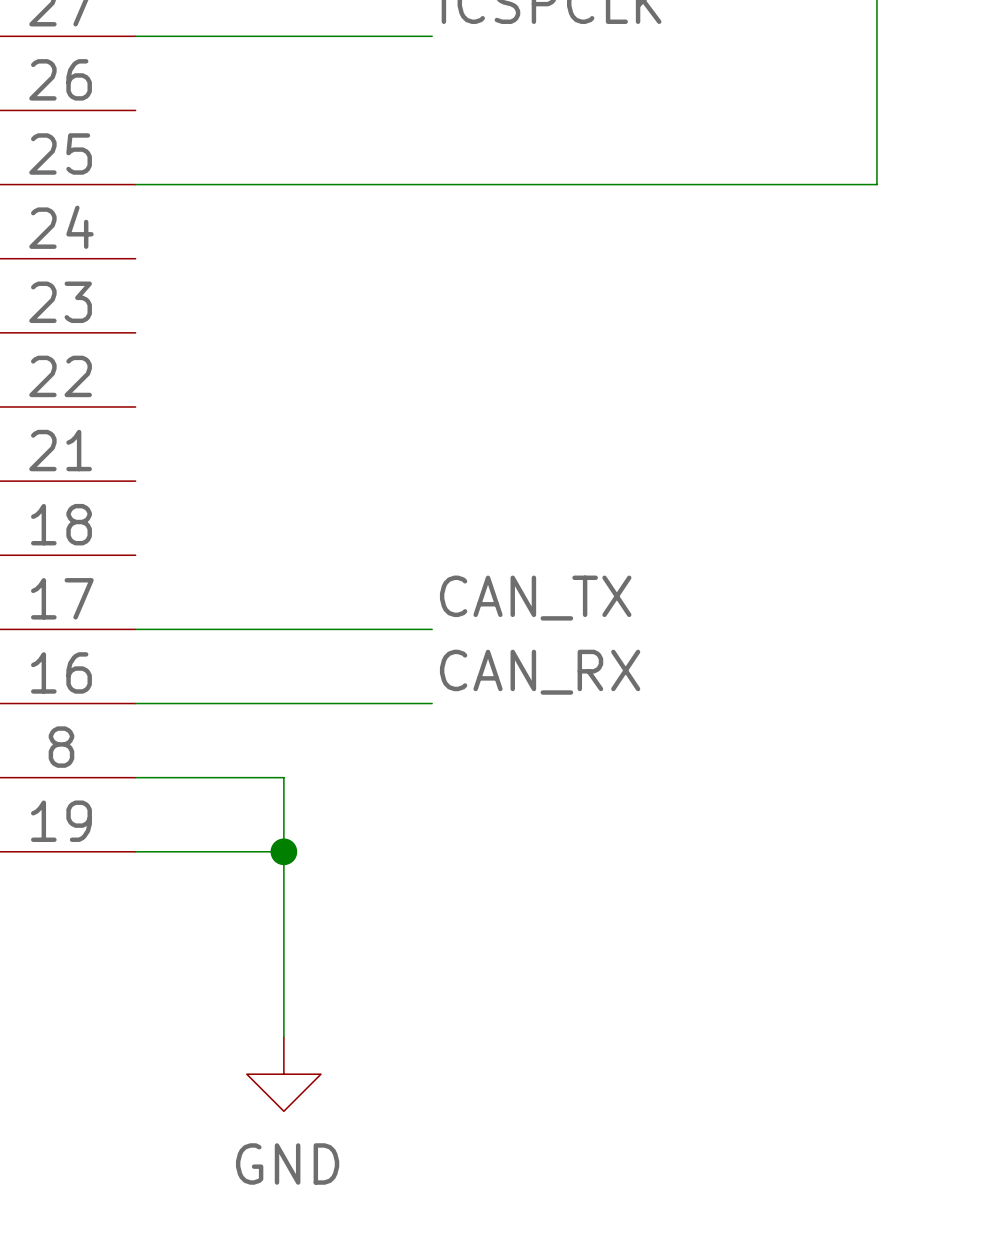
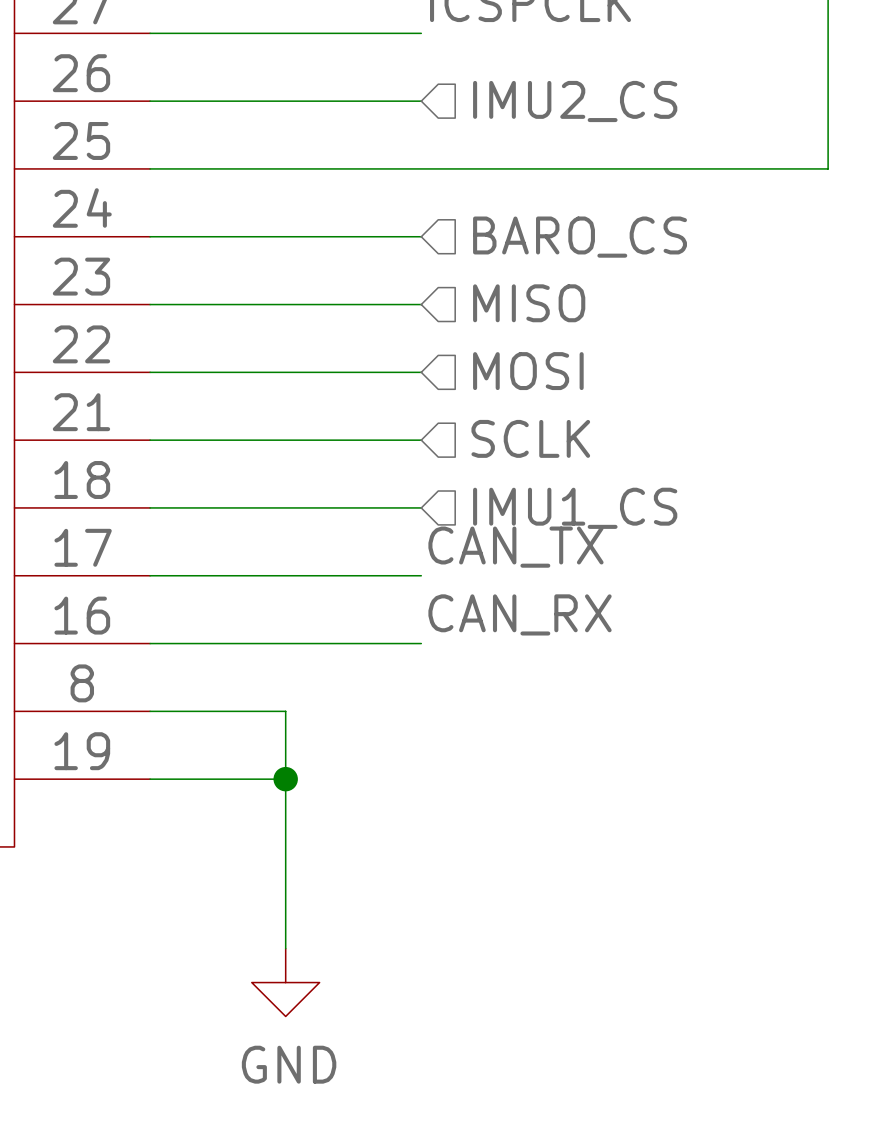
wire: none -> (150, 101) (421, 101)
hierarchical label: none -> IMU2_CS (575, 101)
wire: none -> (150, 236) (421, 236)
hierarchical label: none -> BARO_CS (580, 237)
hierarchical label: none -> MISO (529, 303)
wire: none -> (150, 304) (421, 304)
hierarchical label: none -> MOSI (528, 371)
wire: none -> (150, 372) (421, 372)
hierarchical label: none -> SCLK (530, 438)
wire: none -> (150, 440) (421, 440)
wire: none -> (150, 507) (421, 507)
hierarchical label: none -> IMU1_CS (575, 508)

